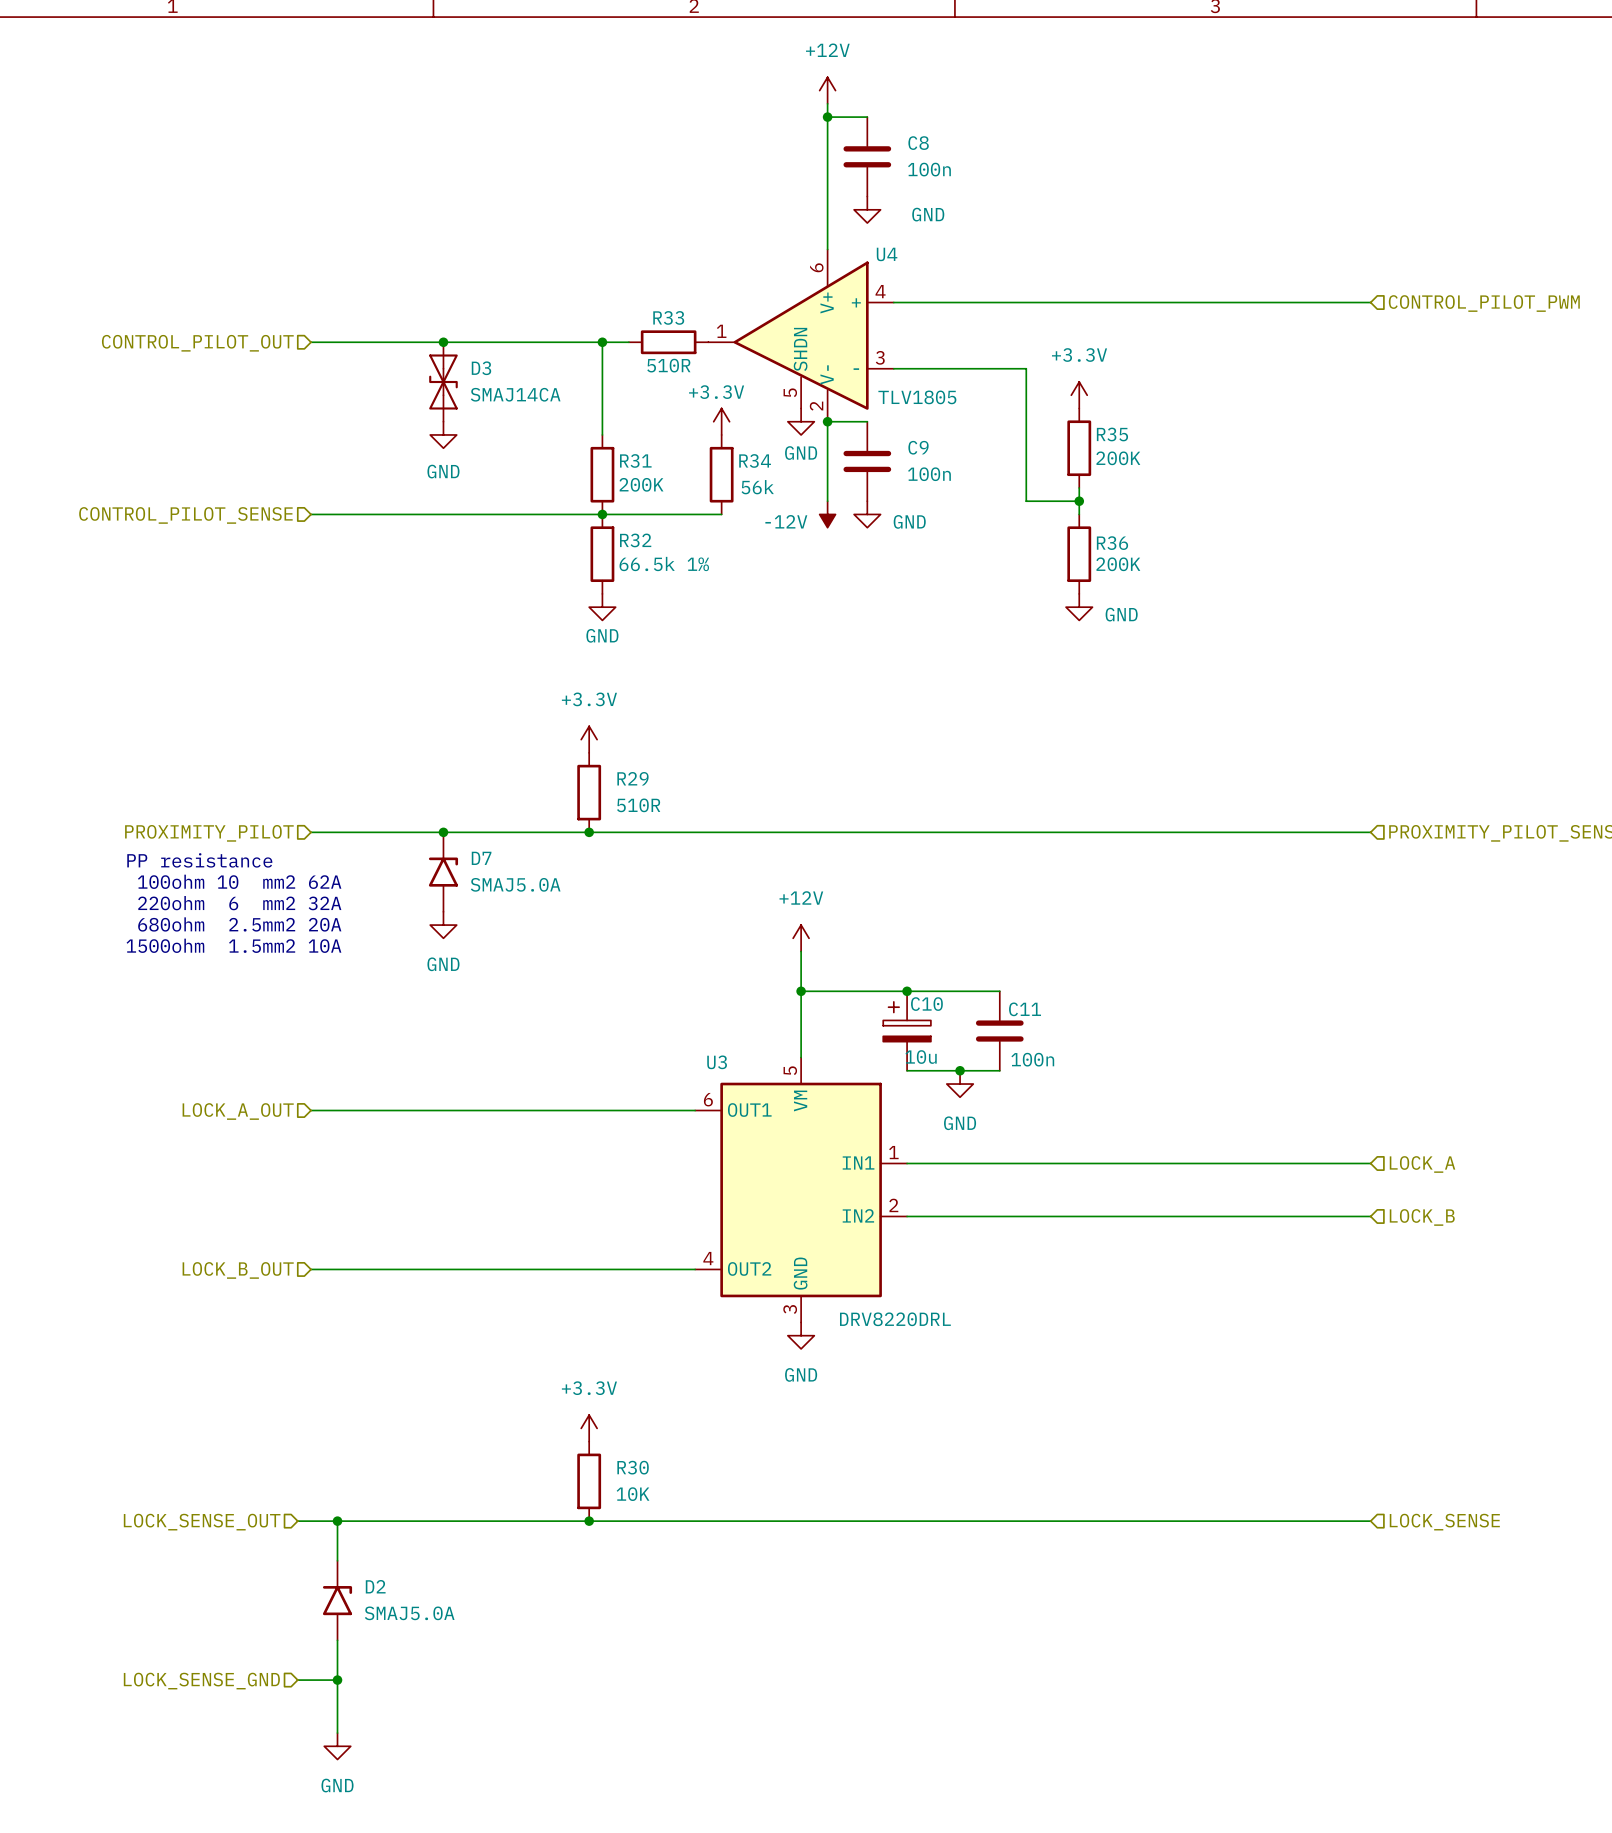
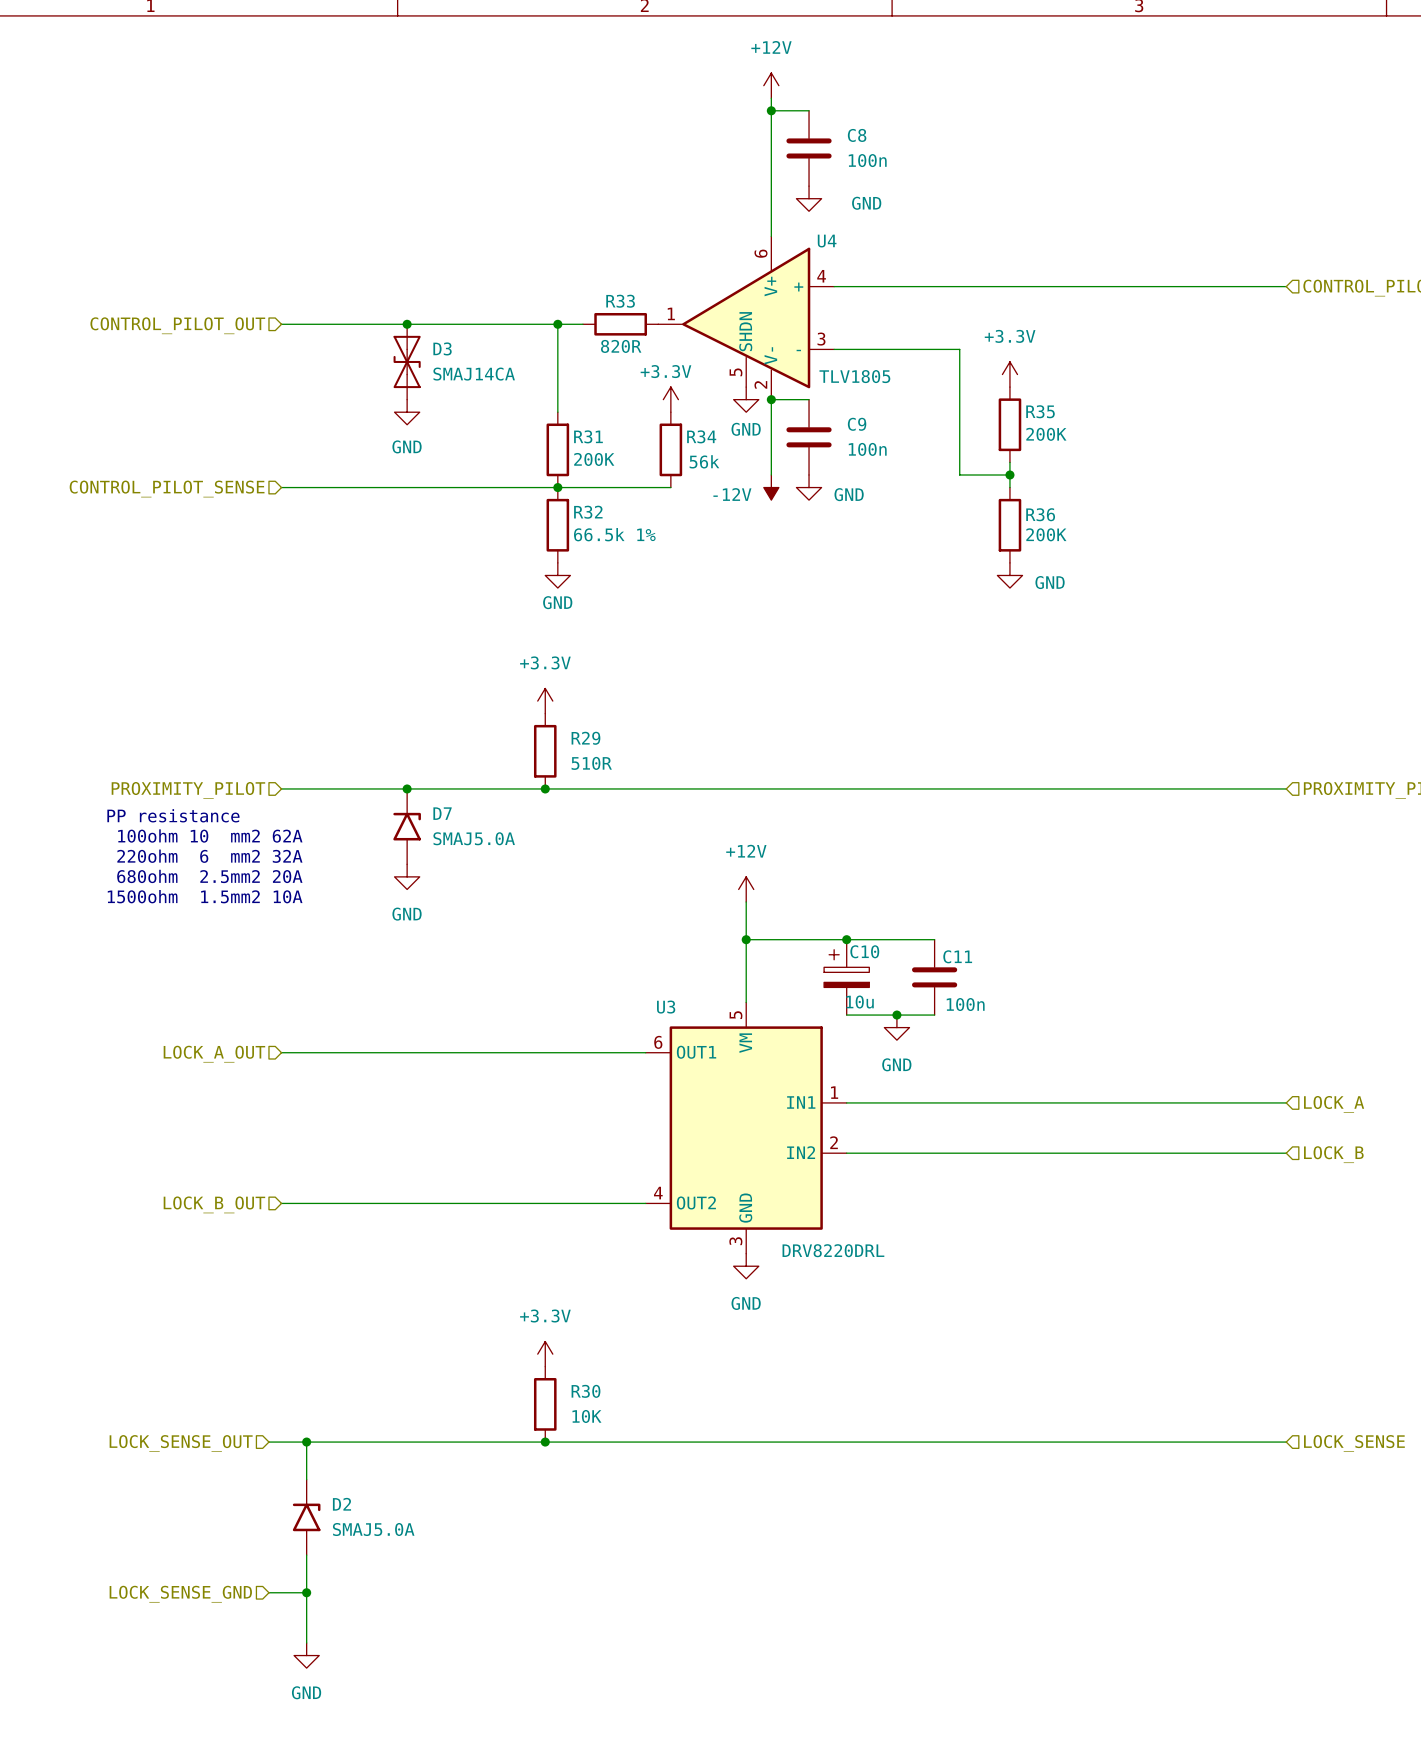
R33 value: 510R (668, 365) -> 820R (621, 346)

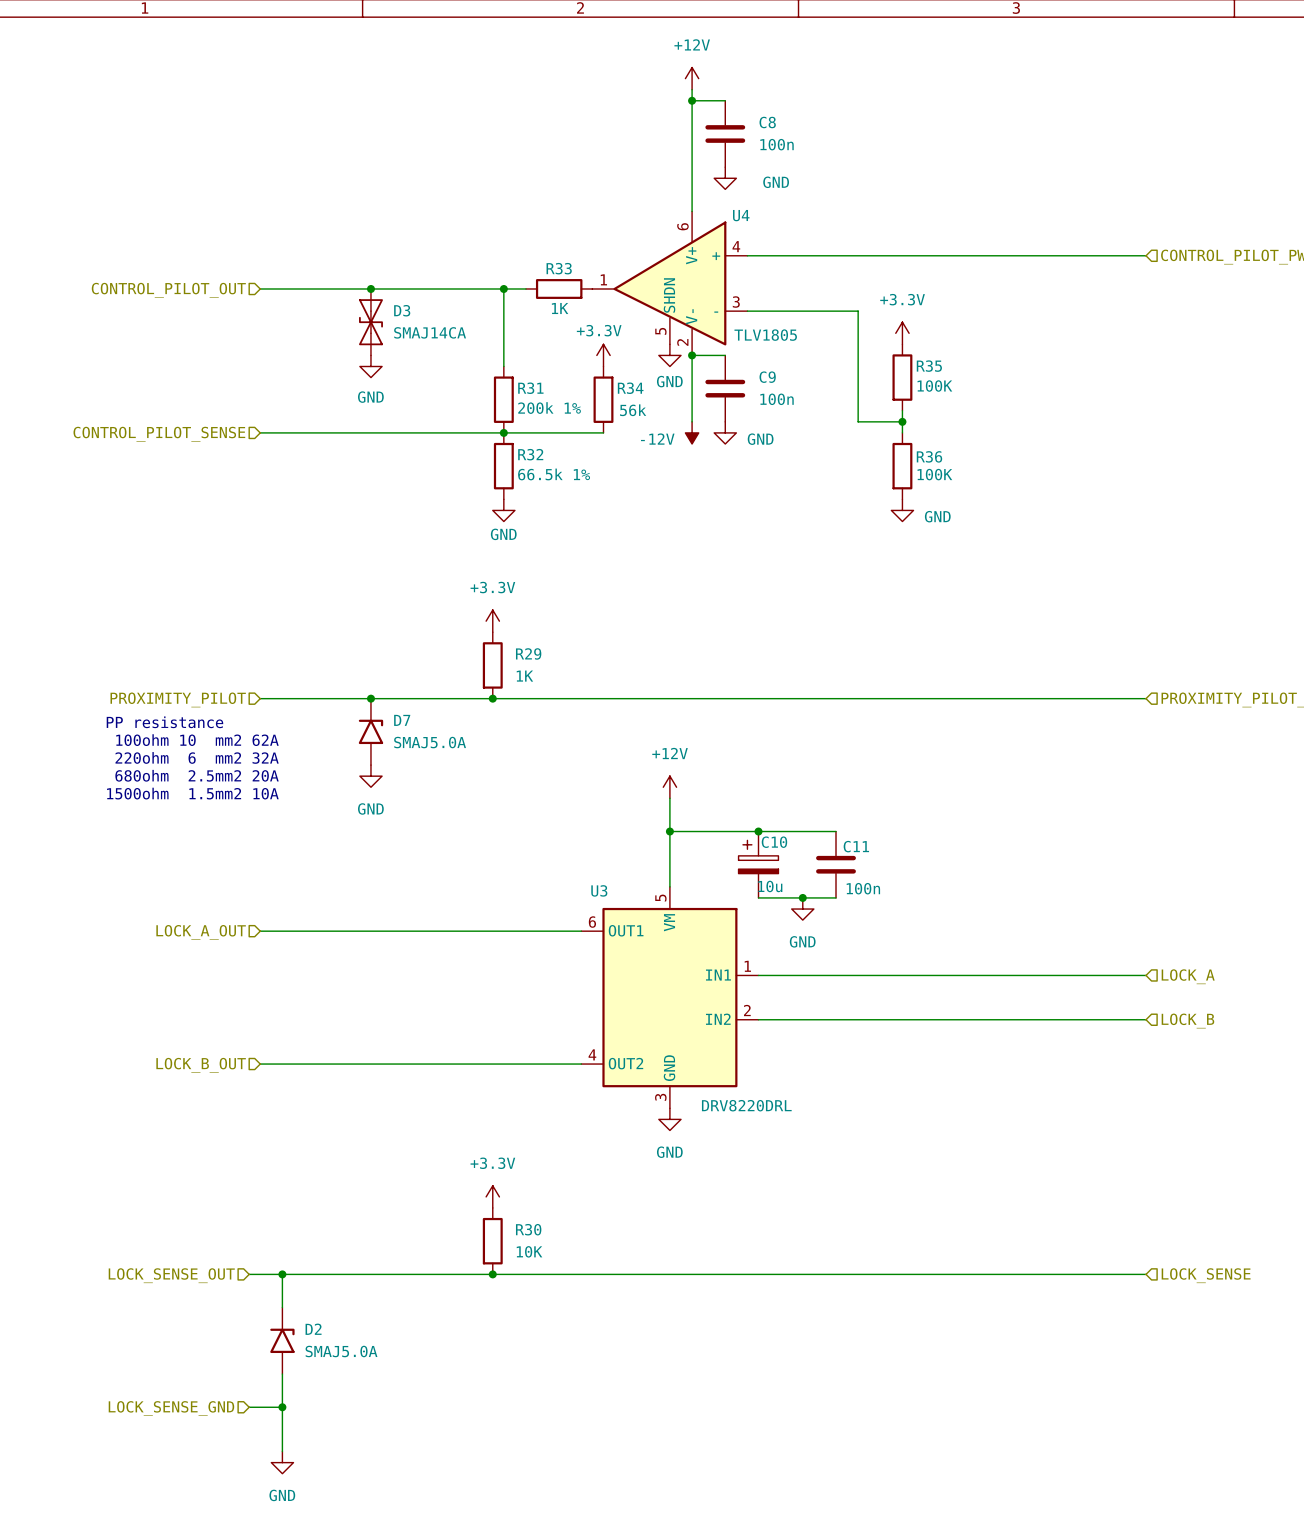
R33 value: 820R (621, 346) -> 1K (560, 308)
R35 value: 200K (1046, 434) -> 100K (934, 386)
R31 value: 200K (594, 459) -> 200k 1% (549, 408)
R36 value: 200K (1046, 534) -> 100K (934, 474)
R29 value: 510R (591, 763) -> 1K (524, 676)

